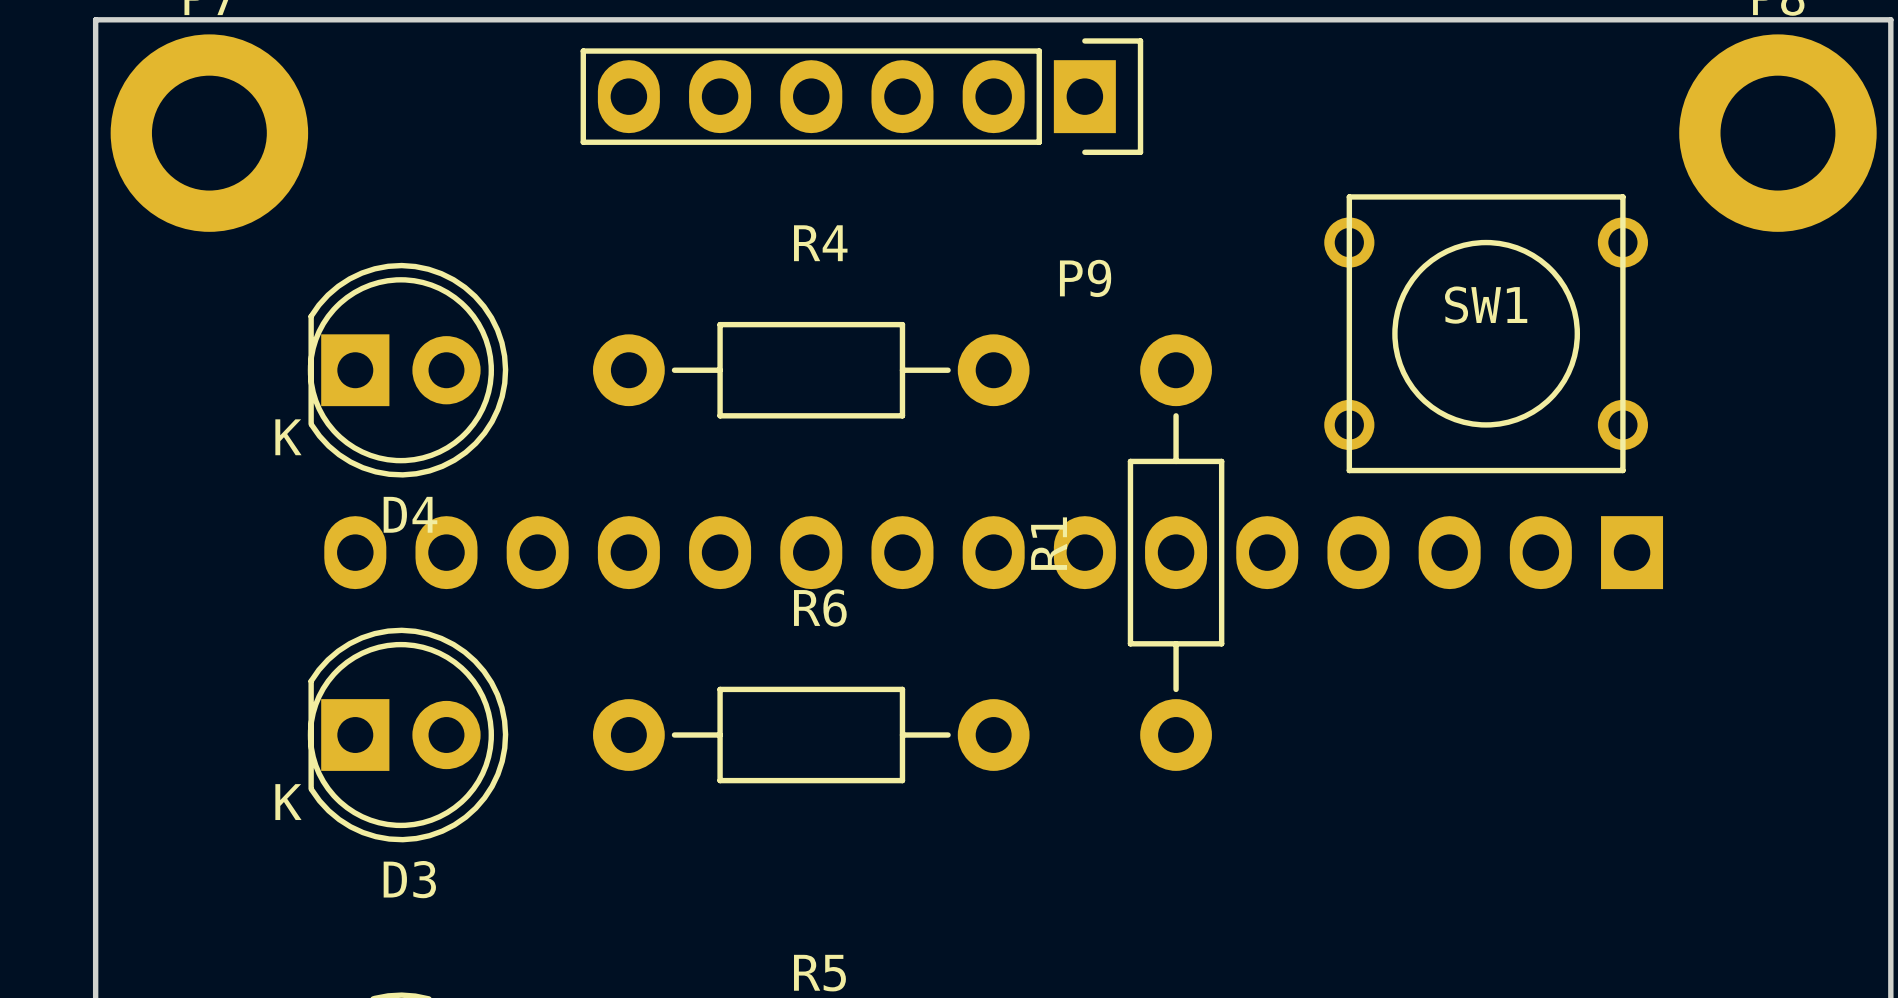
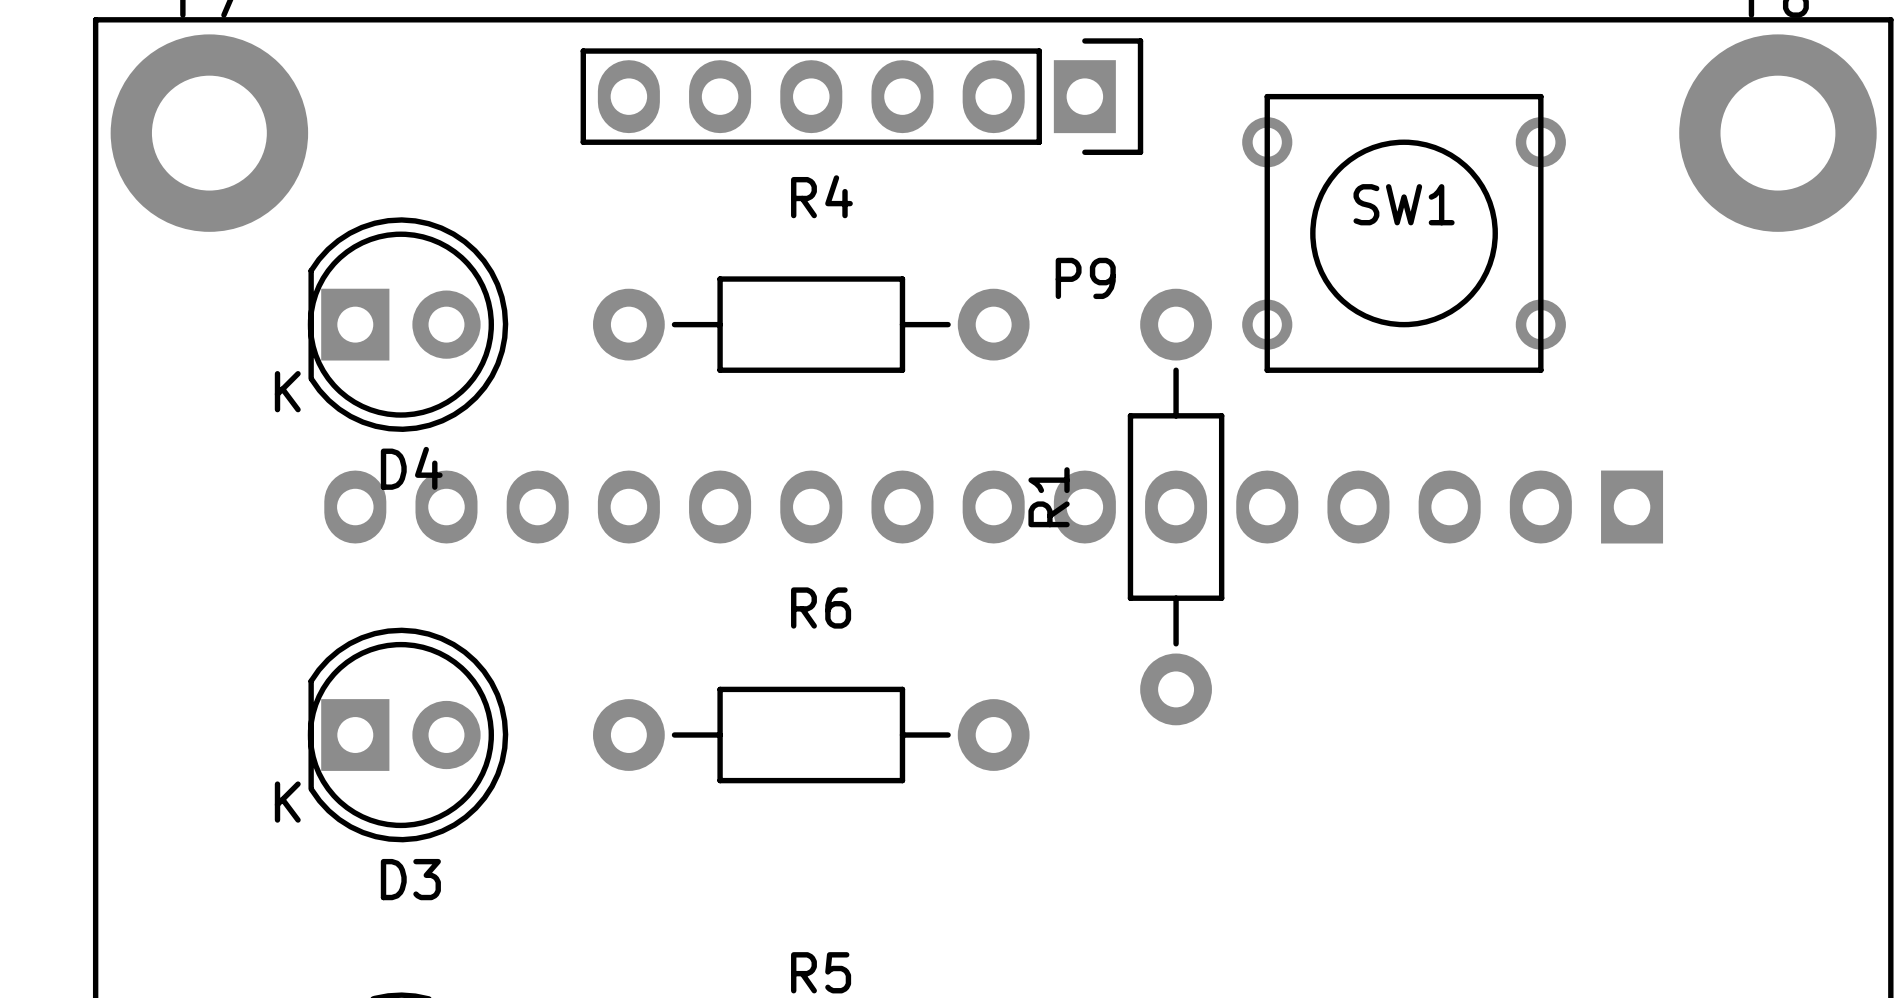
SW1 position: (1486, 333) -> (1404, 233)
D4 position: (408, 370) -> (408, 324)
R4 position: (811, 370) -> (811, 324)
part position: (993, 552) -> (993, 507)
R1 position: (1176, 552) -> (1176, 507)

